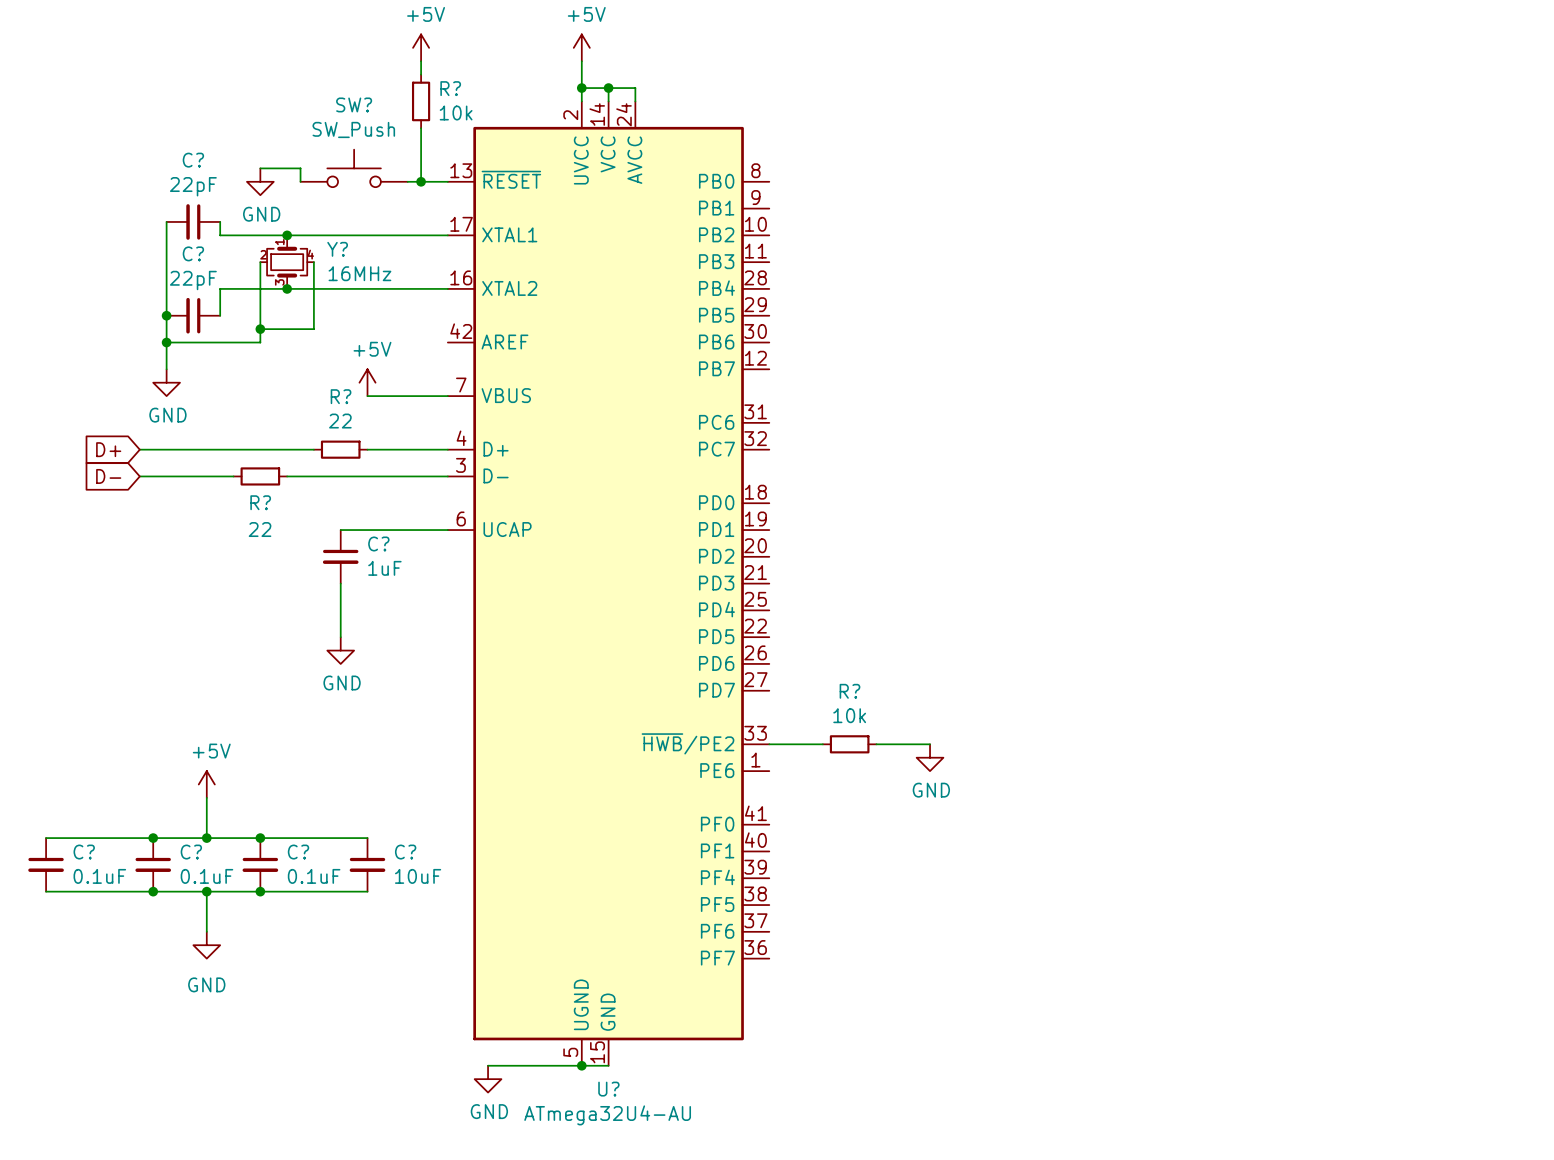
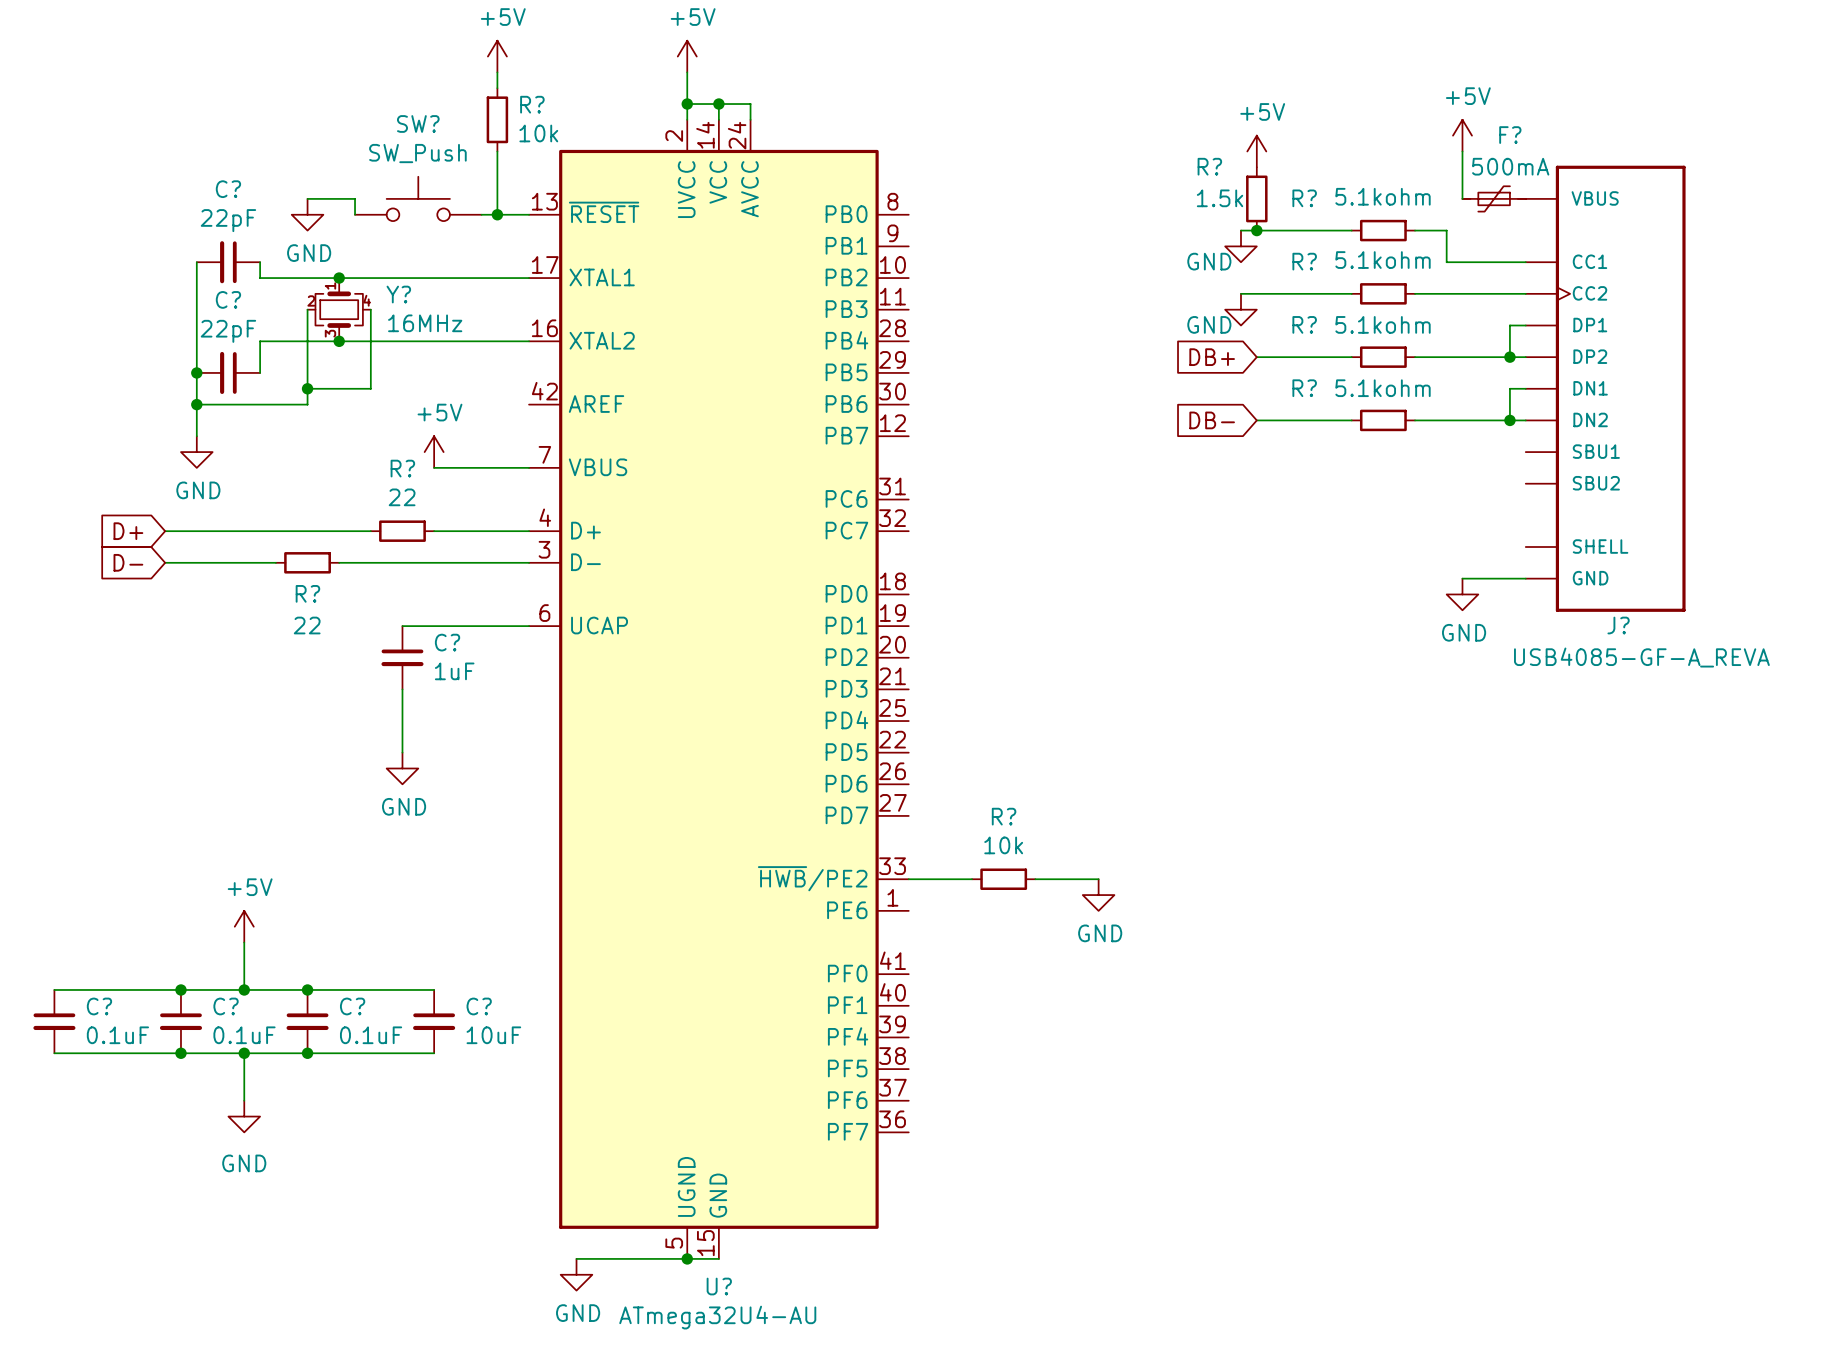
power symbol: none -> +5V (1462, 135)
power symbol: none -> +5V (1256, 151)
wire: none -> (1462, 151) (1462, 198)
R?: none -> 1.5k (1256, 198)
F?: none -> 500mA (1494, 198)
wire: none -> (1240, 230) (1351, 230)
junction: none -> (1256, 230)
R?: none -> 5.1kohm (1383, 230)
wire: none -> (1415, 230) (1446, 230) (1446, 262) (1525, 262)
power symbol: none -> GND (1240, 246)
wire: none -> (1240, 293) (1351, 293)
R?: none -> 5.1kohm (1383, 293)
wire: none -> (1415, 293) (1525, 293)
power symbol: none -> GND (1240, 309)
wire: none -> (1525, 325) (1509, 325) (1509, 357)
global label: none -> DB+ (1212, 357)
wire: none -> (1256, 357) (1351, 357)
R?: none -> 5.1kohm (1383, 357)
wire: none -> (1415, 357) (1525, 357)
junction: none -> (1509, 357)
wire: none -> (1525, 388) (1509, 388) (1509, 420)
J?: none -> USB4085-GF-A_REVA (1605, 388)
global label: none -> DB- (1212, 420)
wire: none -> (1256, 420) (1351, 420)
R?: none -> 5.1kohm (1383, 420)
wire: none -> (1415, 420) (1525, 420)
junction: none -> (1509, 420)
wire: none -> (1462, 578) (1525, 578)
power symbol: none -> GND (1462, 594)

